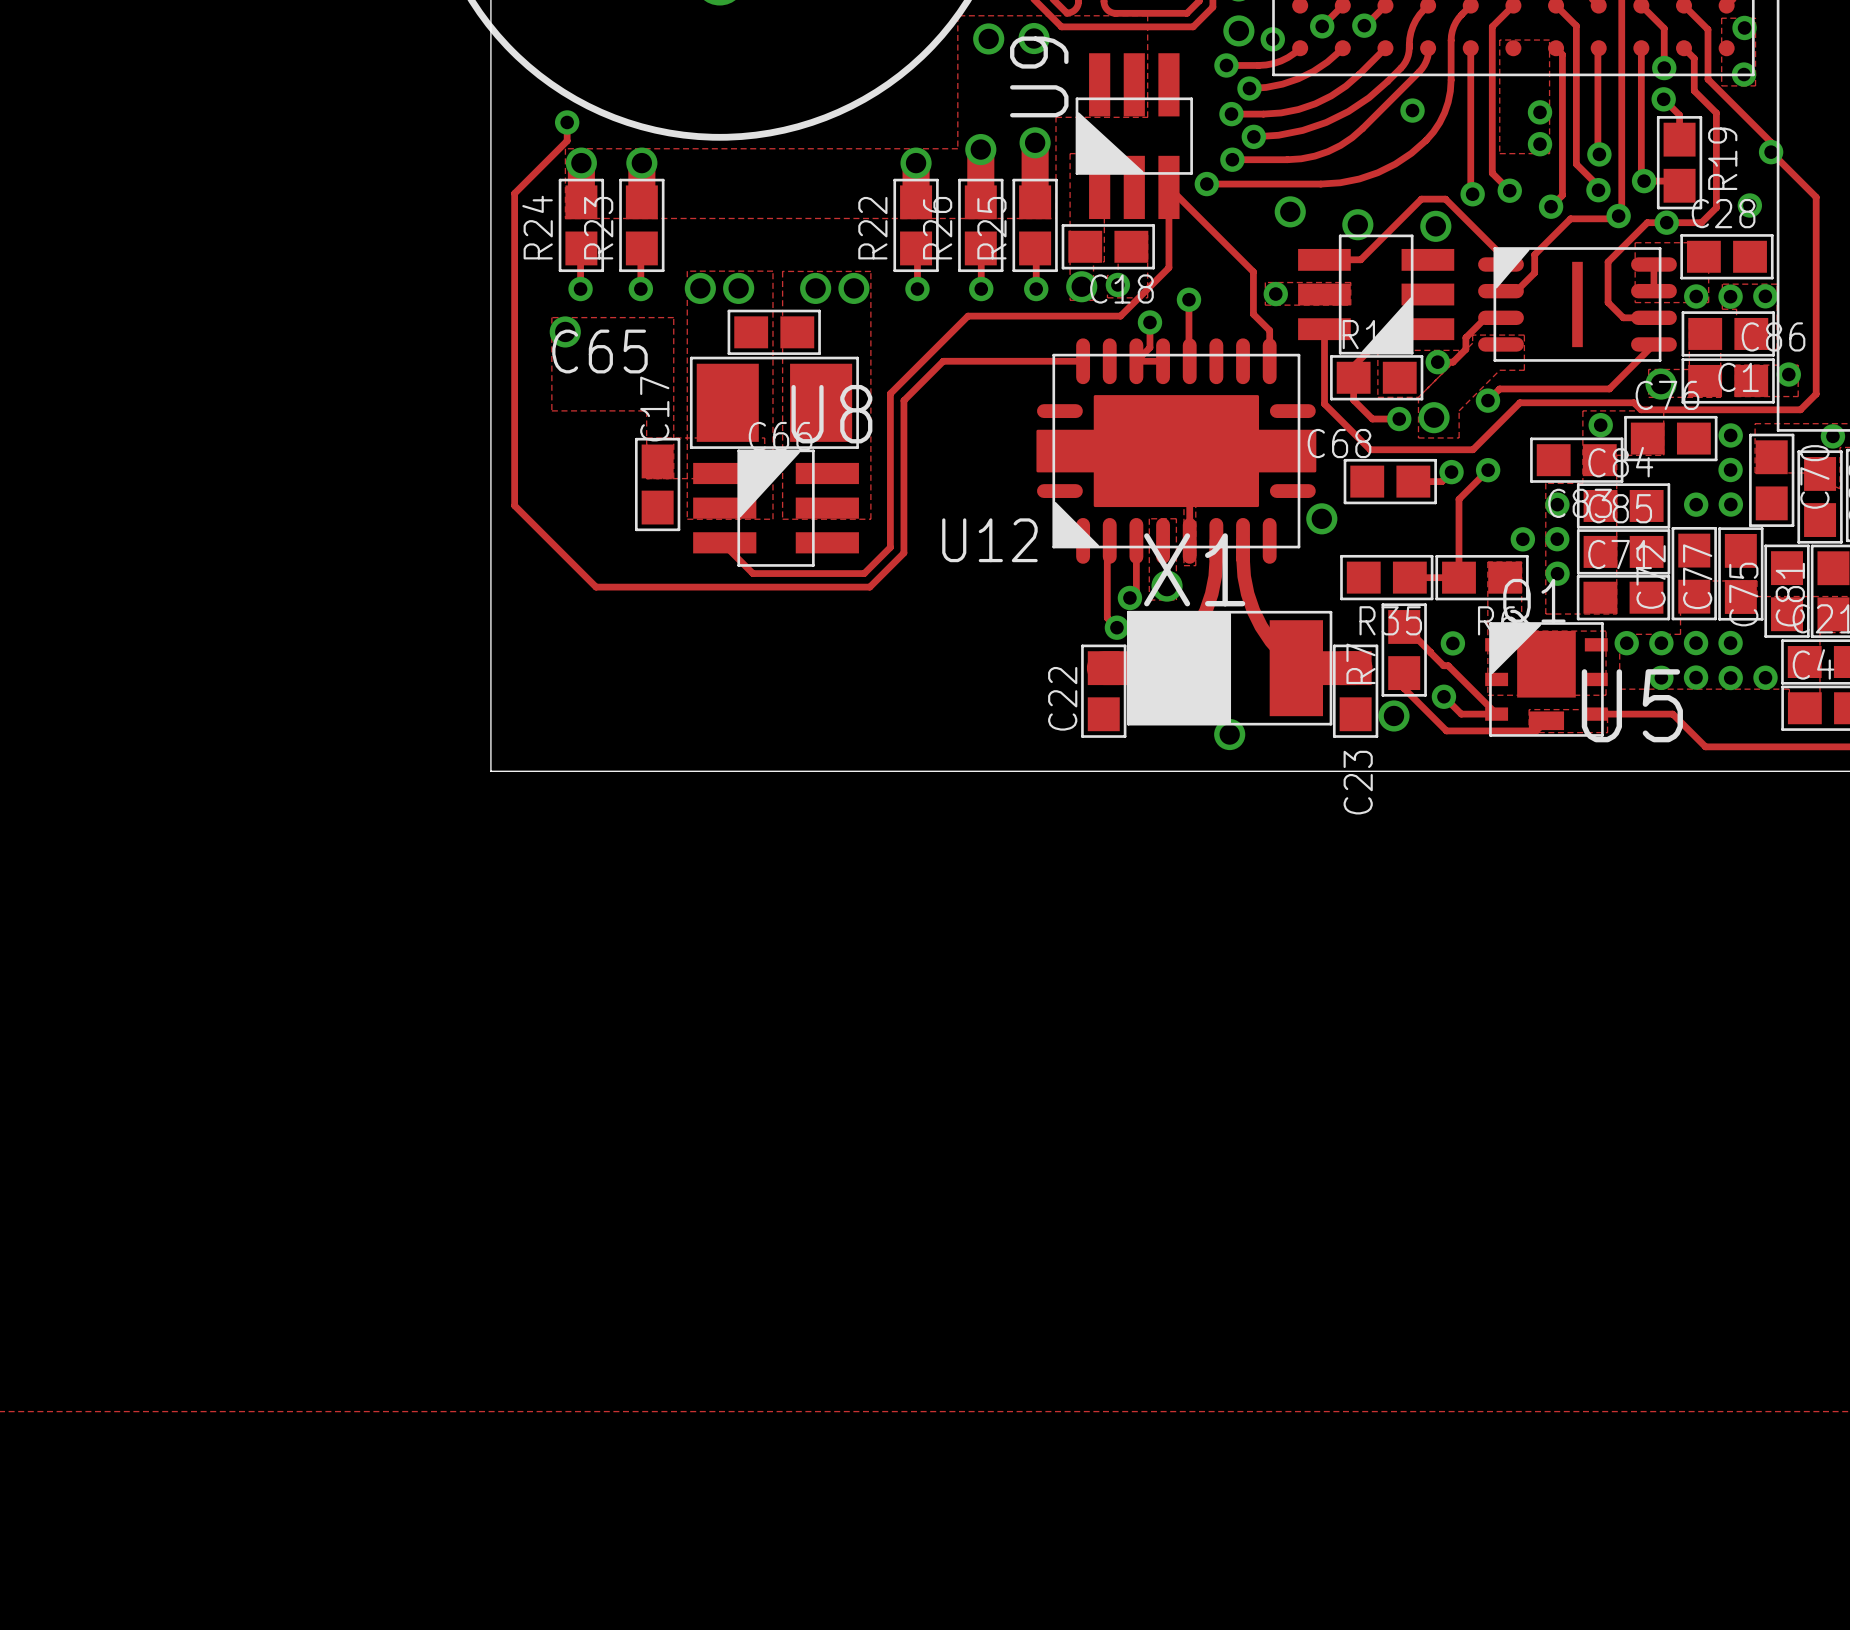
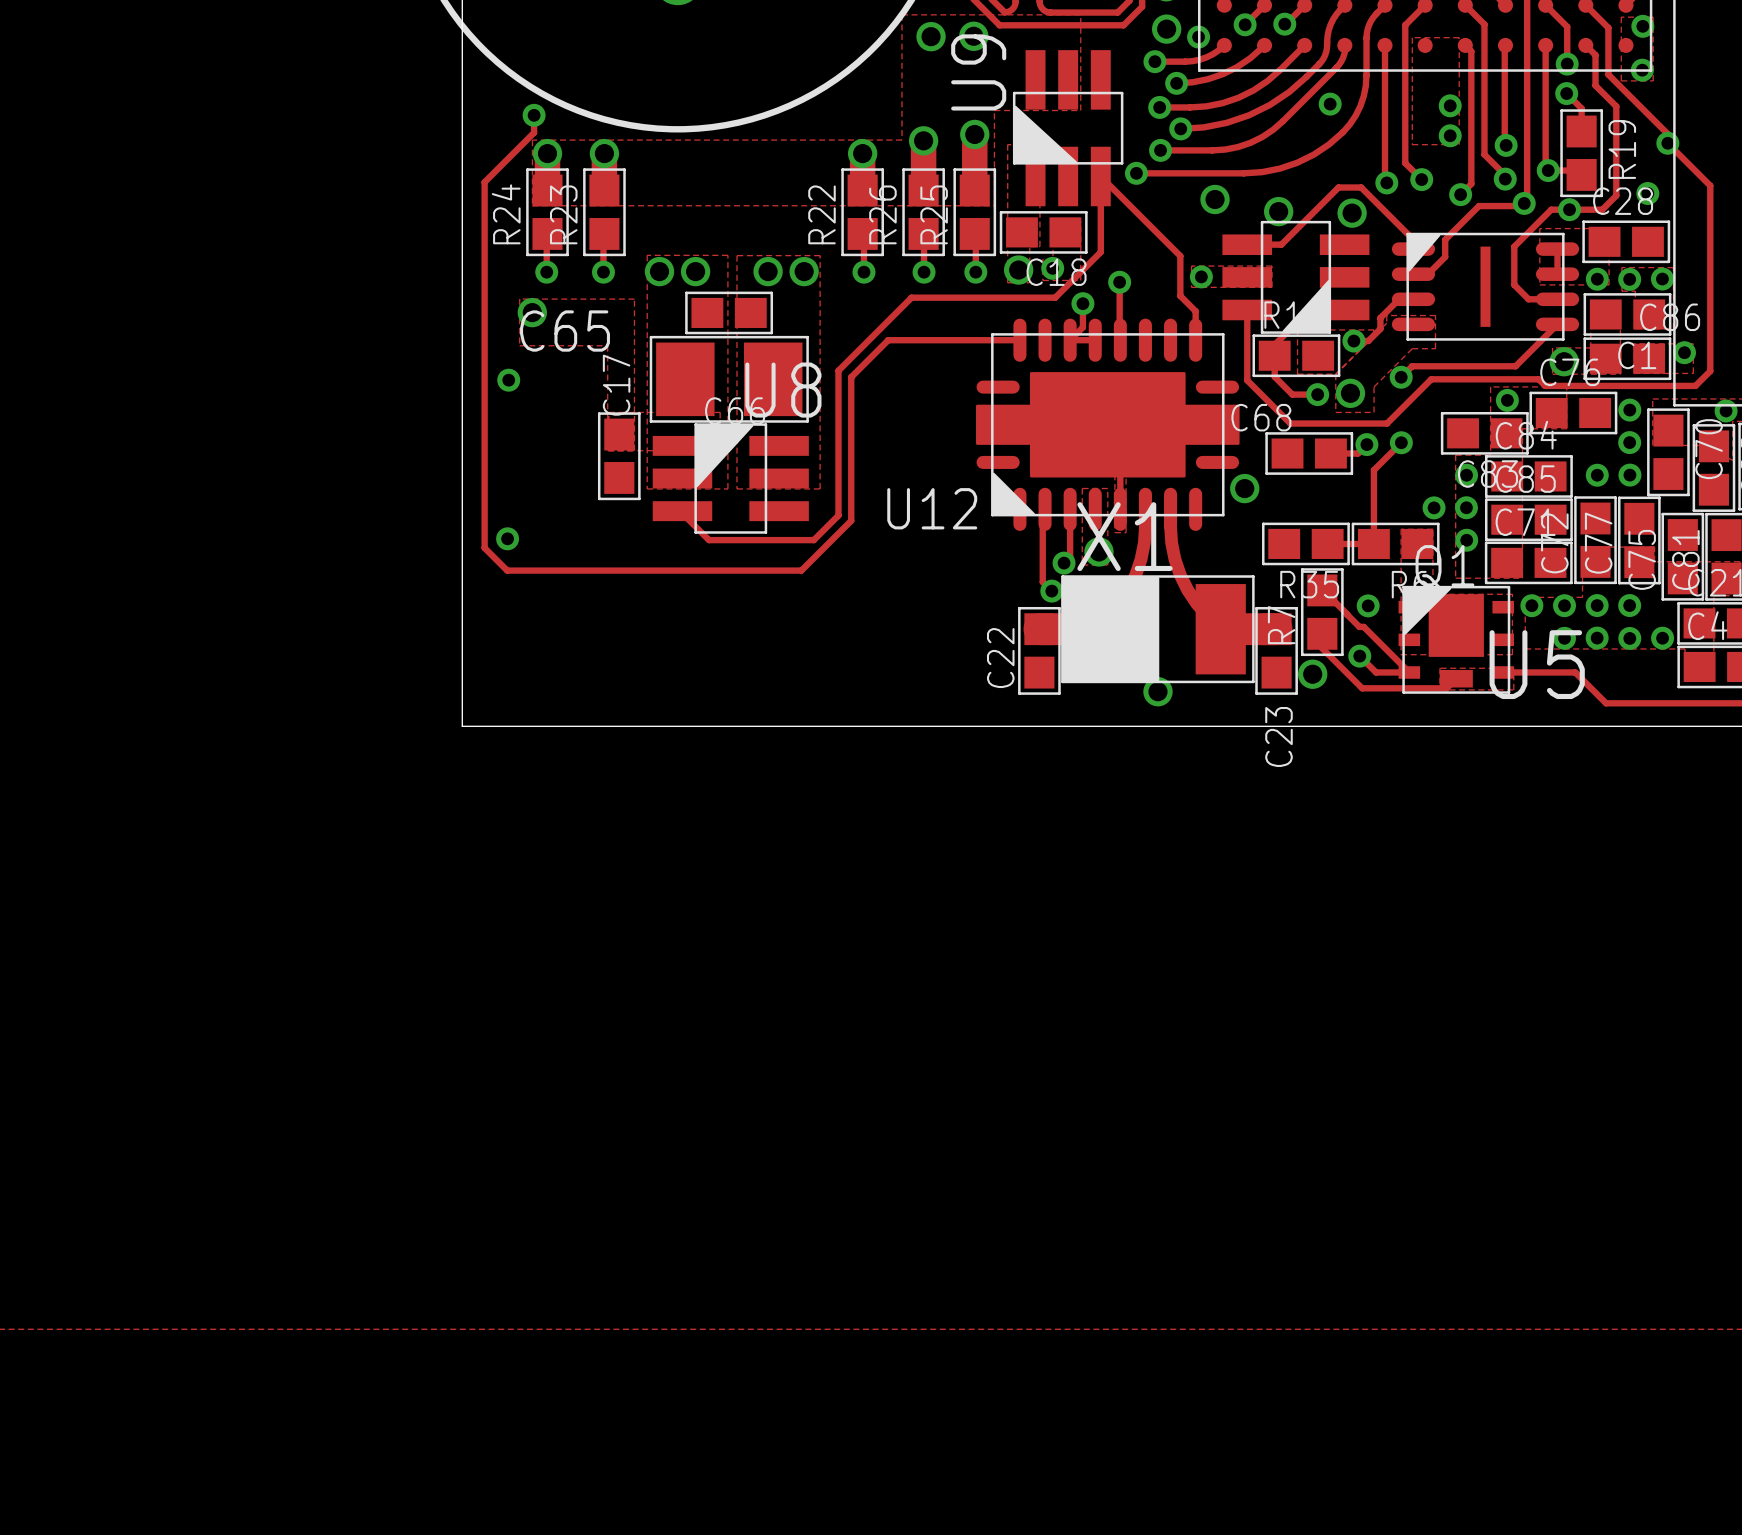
zone outline: (551, 367) (551, 410) (646, 410) (646, 437) -> (519, 345) (607, 345) (608, 450)
via: none -> (508, 380)
track: (514, 505) (596, 587) (869, 587) -> (484, 476) (484, 547) (507, 570) (801, 570) (819, 552)
via: none -> (507, 538)

